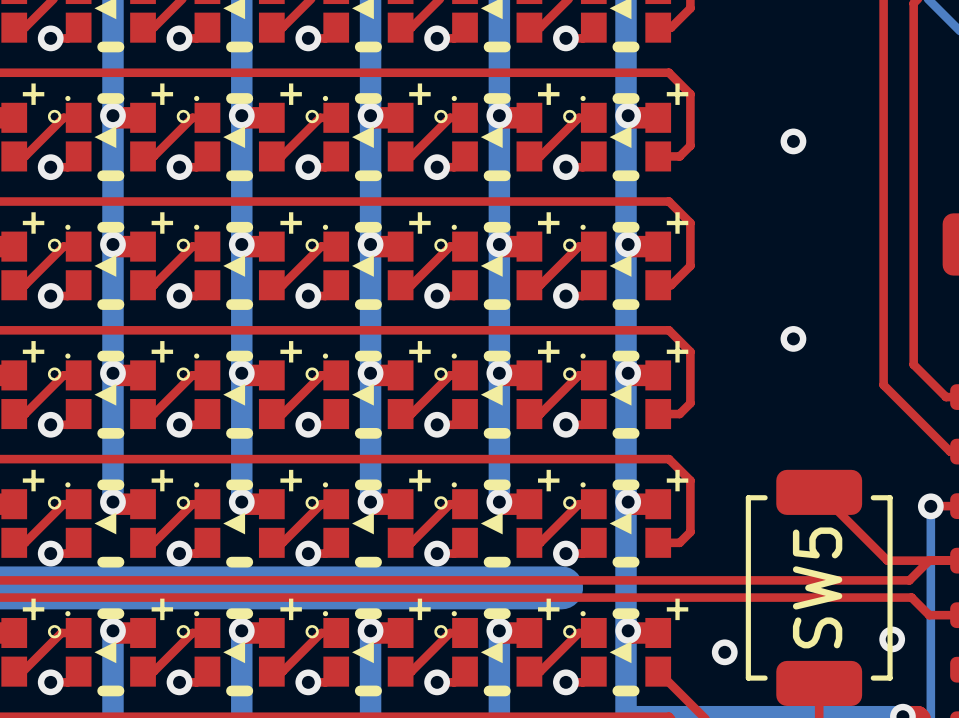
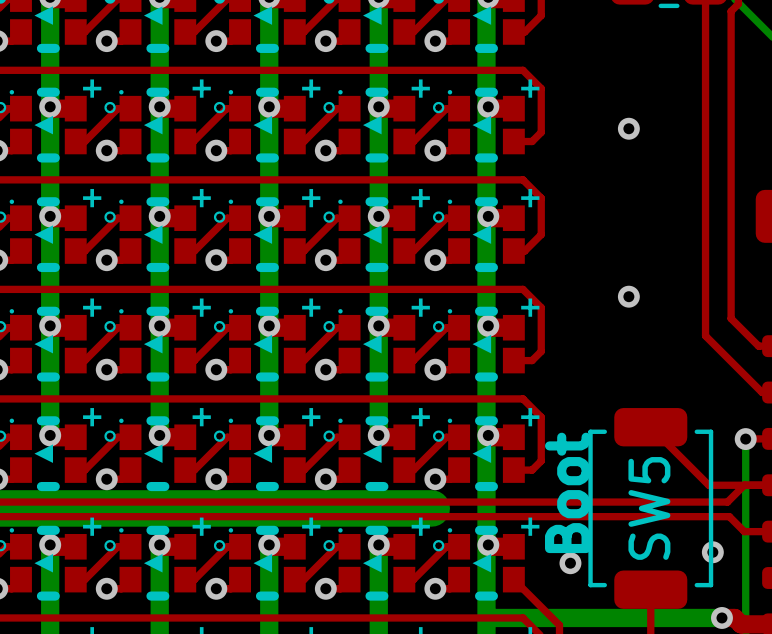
text: none -> Boot (567, 492)

